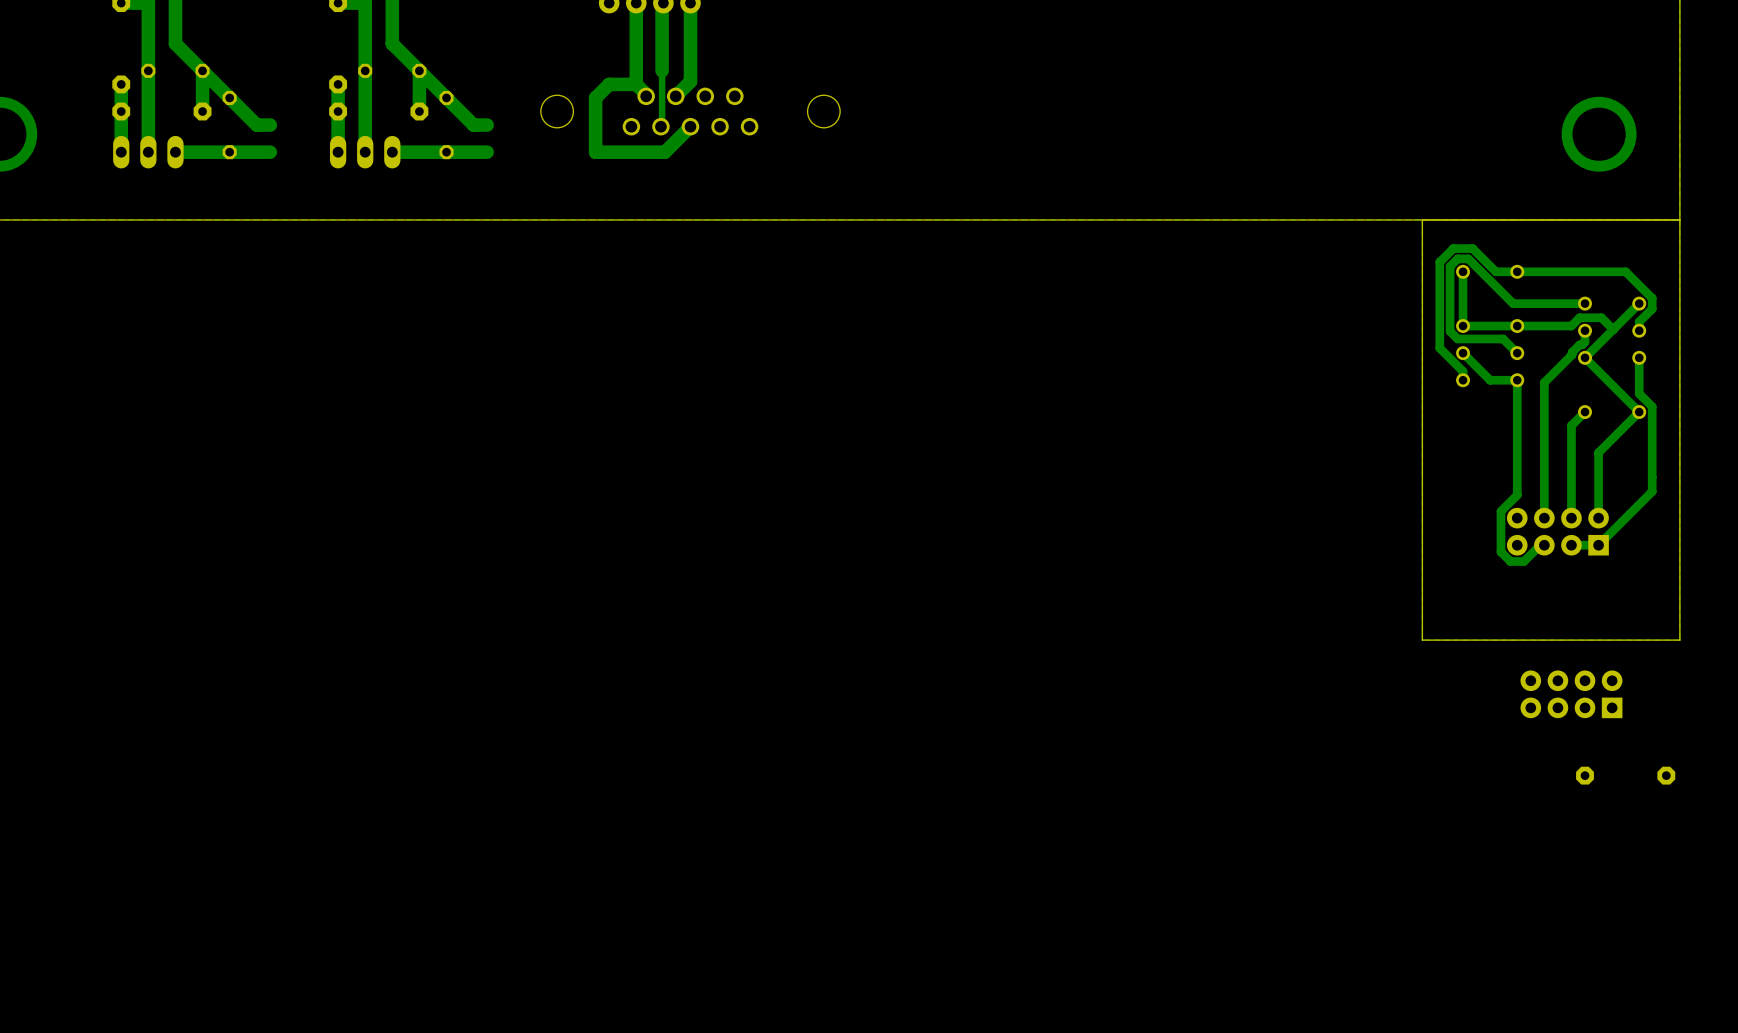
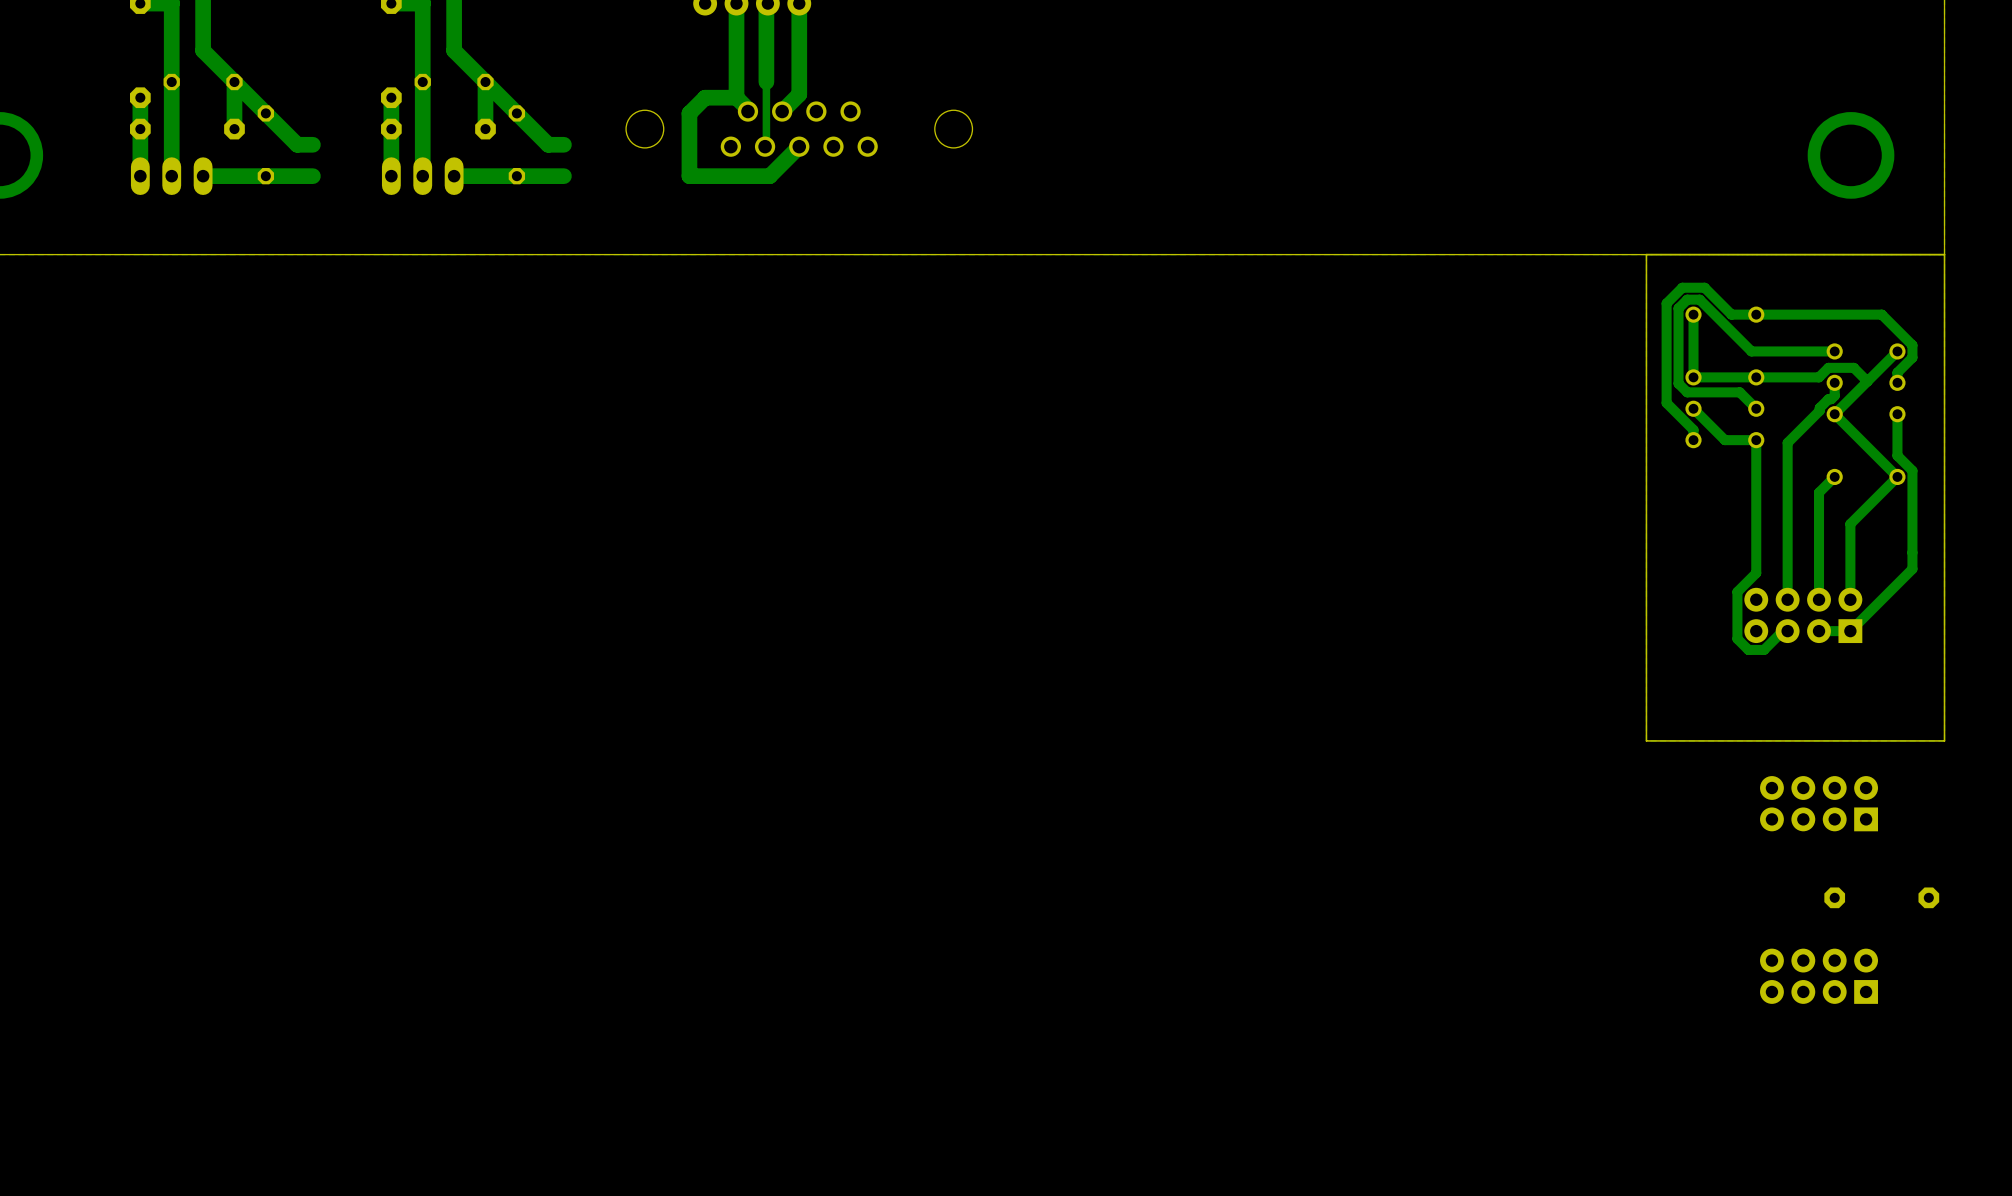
part: none -> (1819, 976)

